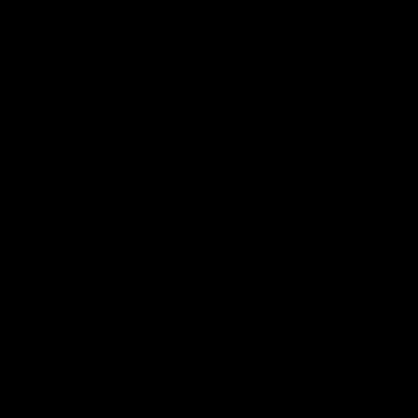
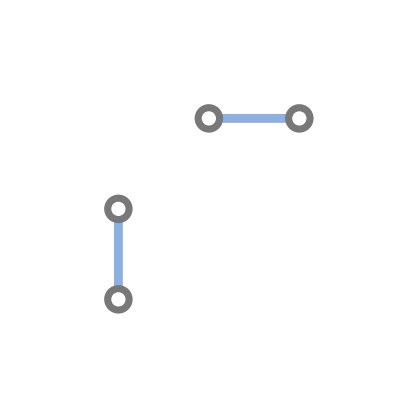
via: none -> (208, 118)
track: none -> (299, 118) (208, 118)
via: none -> (299, 118)
track: none -> (118, 208) (118, 299)
via: none -> (118, 208)
via: none -> (118, 299)

